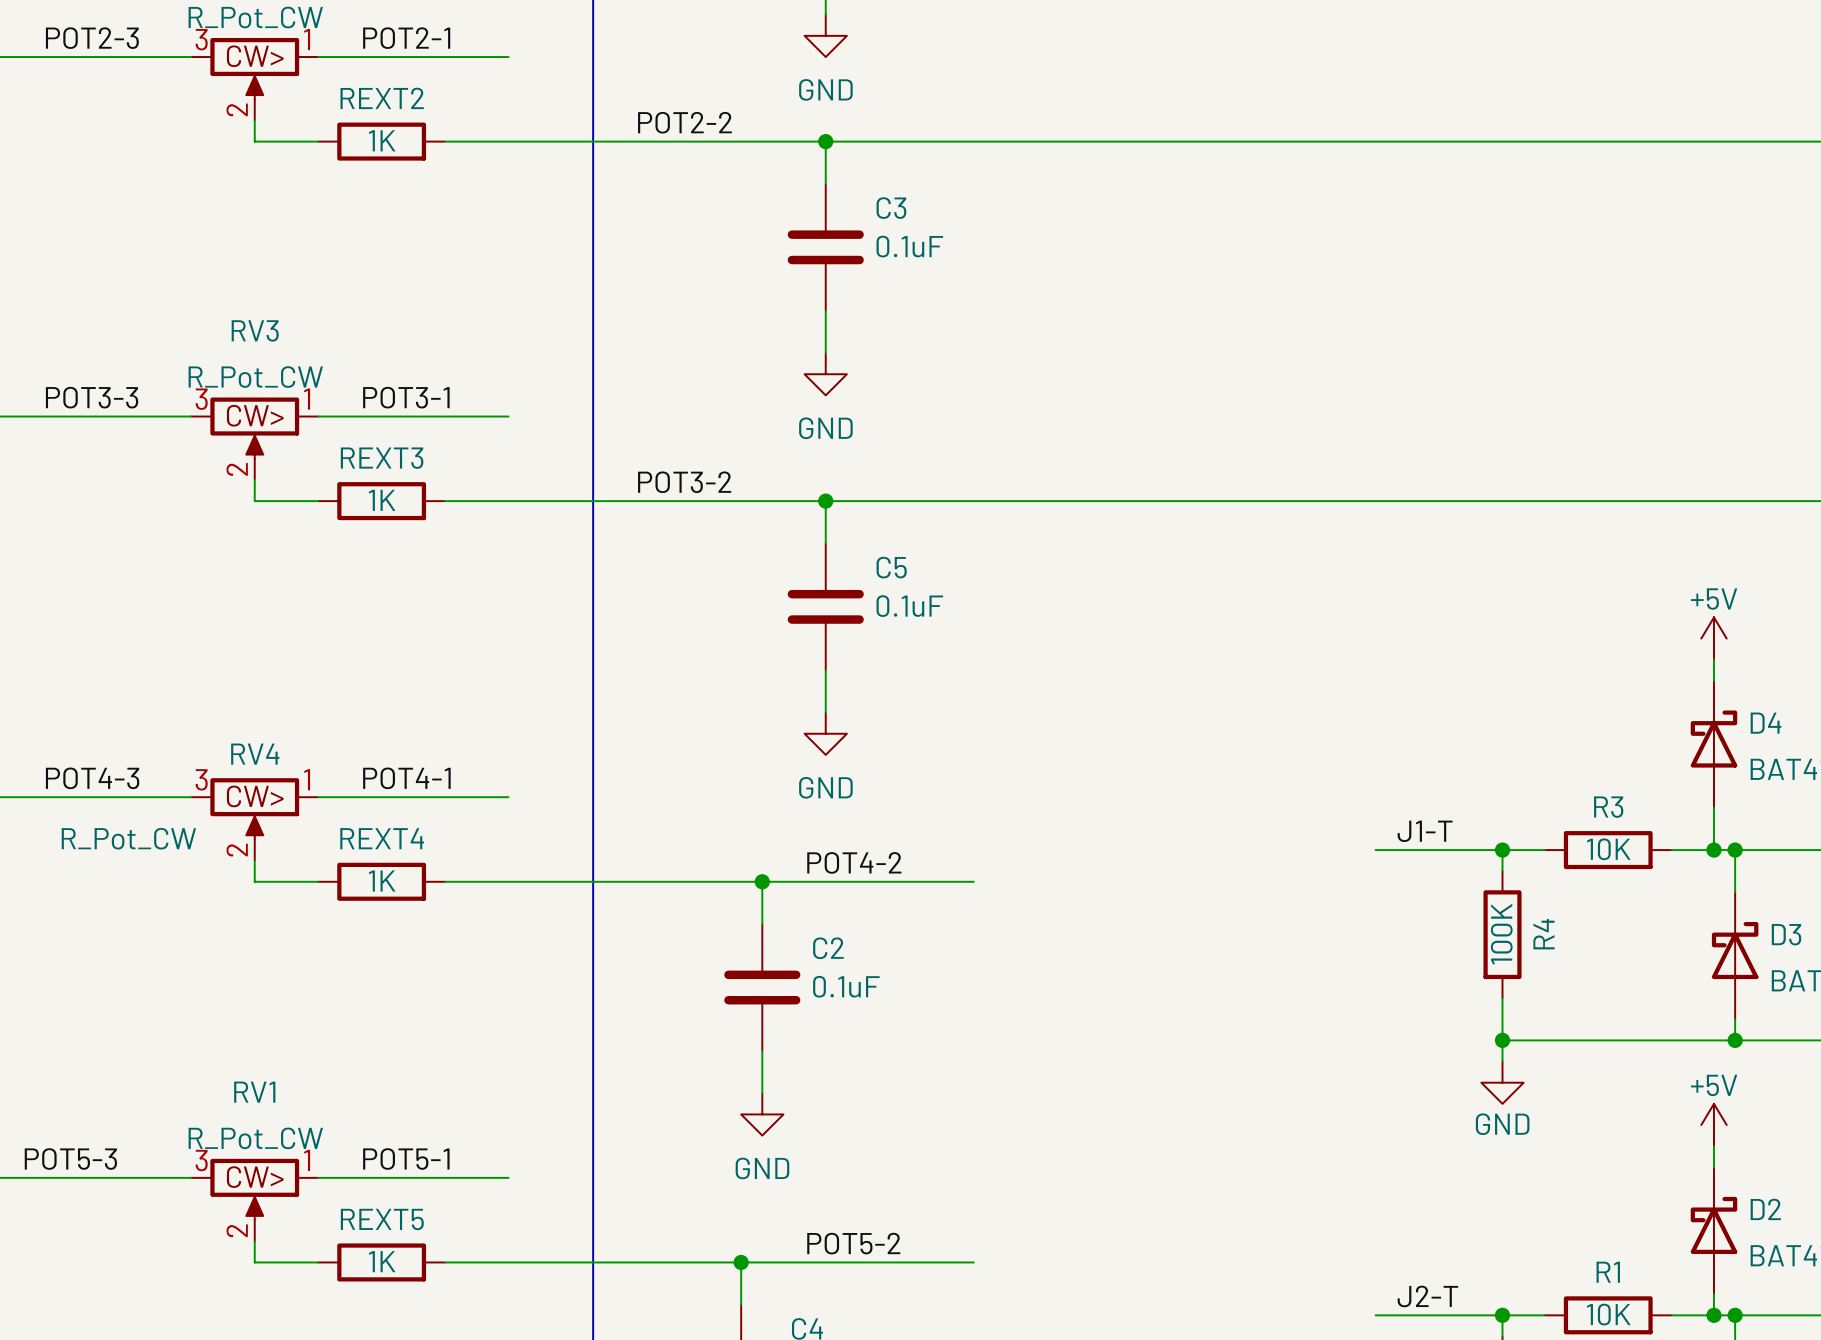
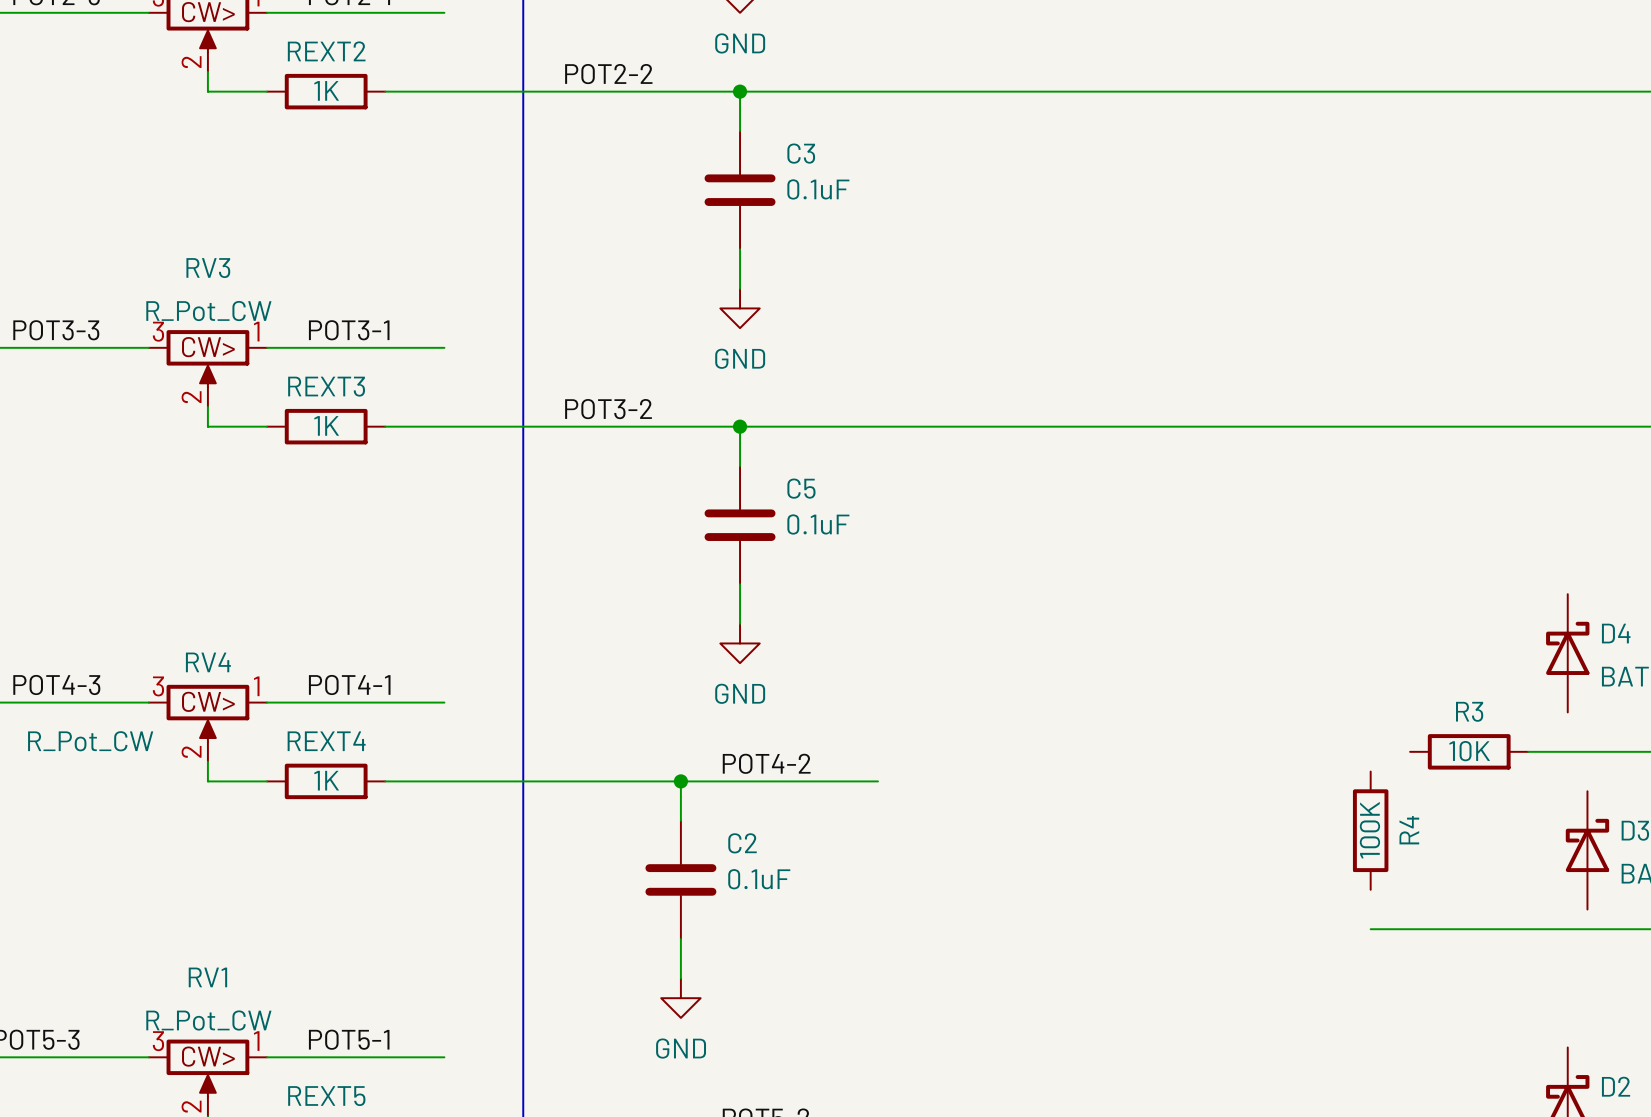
power symbol: +5V (1713, 638) -> none
wire: (1713, 659) (1713, 680) -> none
wire: (1713, 807) (1713, 850) -> none
label: J1-T (1425, 831) -> none
wire: (1375, 850) (1544, 850) -> none
wire: (1502, 850) (1502, 871) -> none
junction: (1502, 850) -> none
junction: (1713, 850) -> none
wire: (1735, 850) (1735, 892) -> none
junction: (1735, 850) -> none
wire: (1502, 998) (1502, 1061) -> none
wire: (1735, 1019) (1735, 1040) -> none
junction: (1502, 1040) -> none
junction: (1735, 1040) -> none
power symbol: GND (1502, 1082) -> none
power symbol: +5V (1713, 1125) -> none
wire: (1713, 1146) (1713, 1167) -> none

